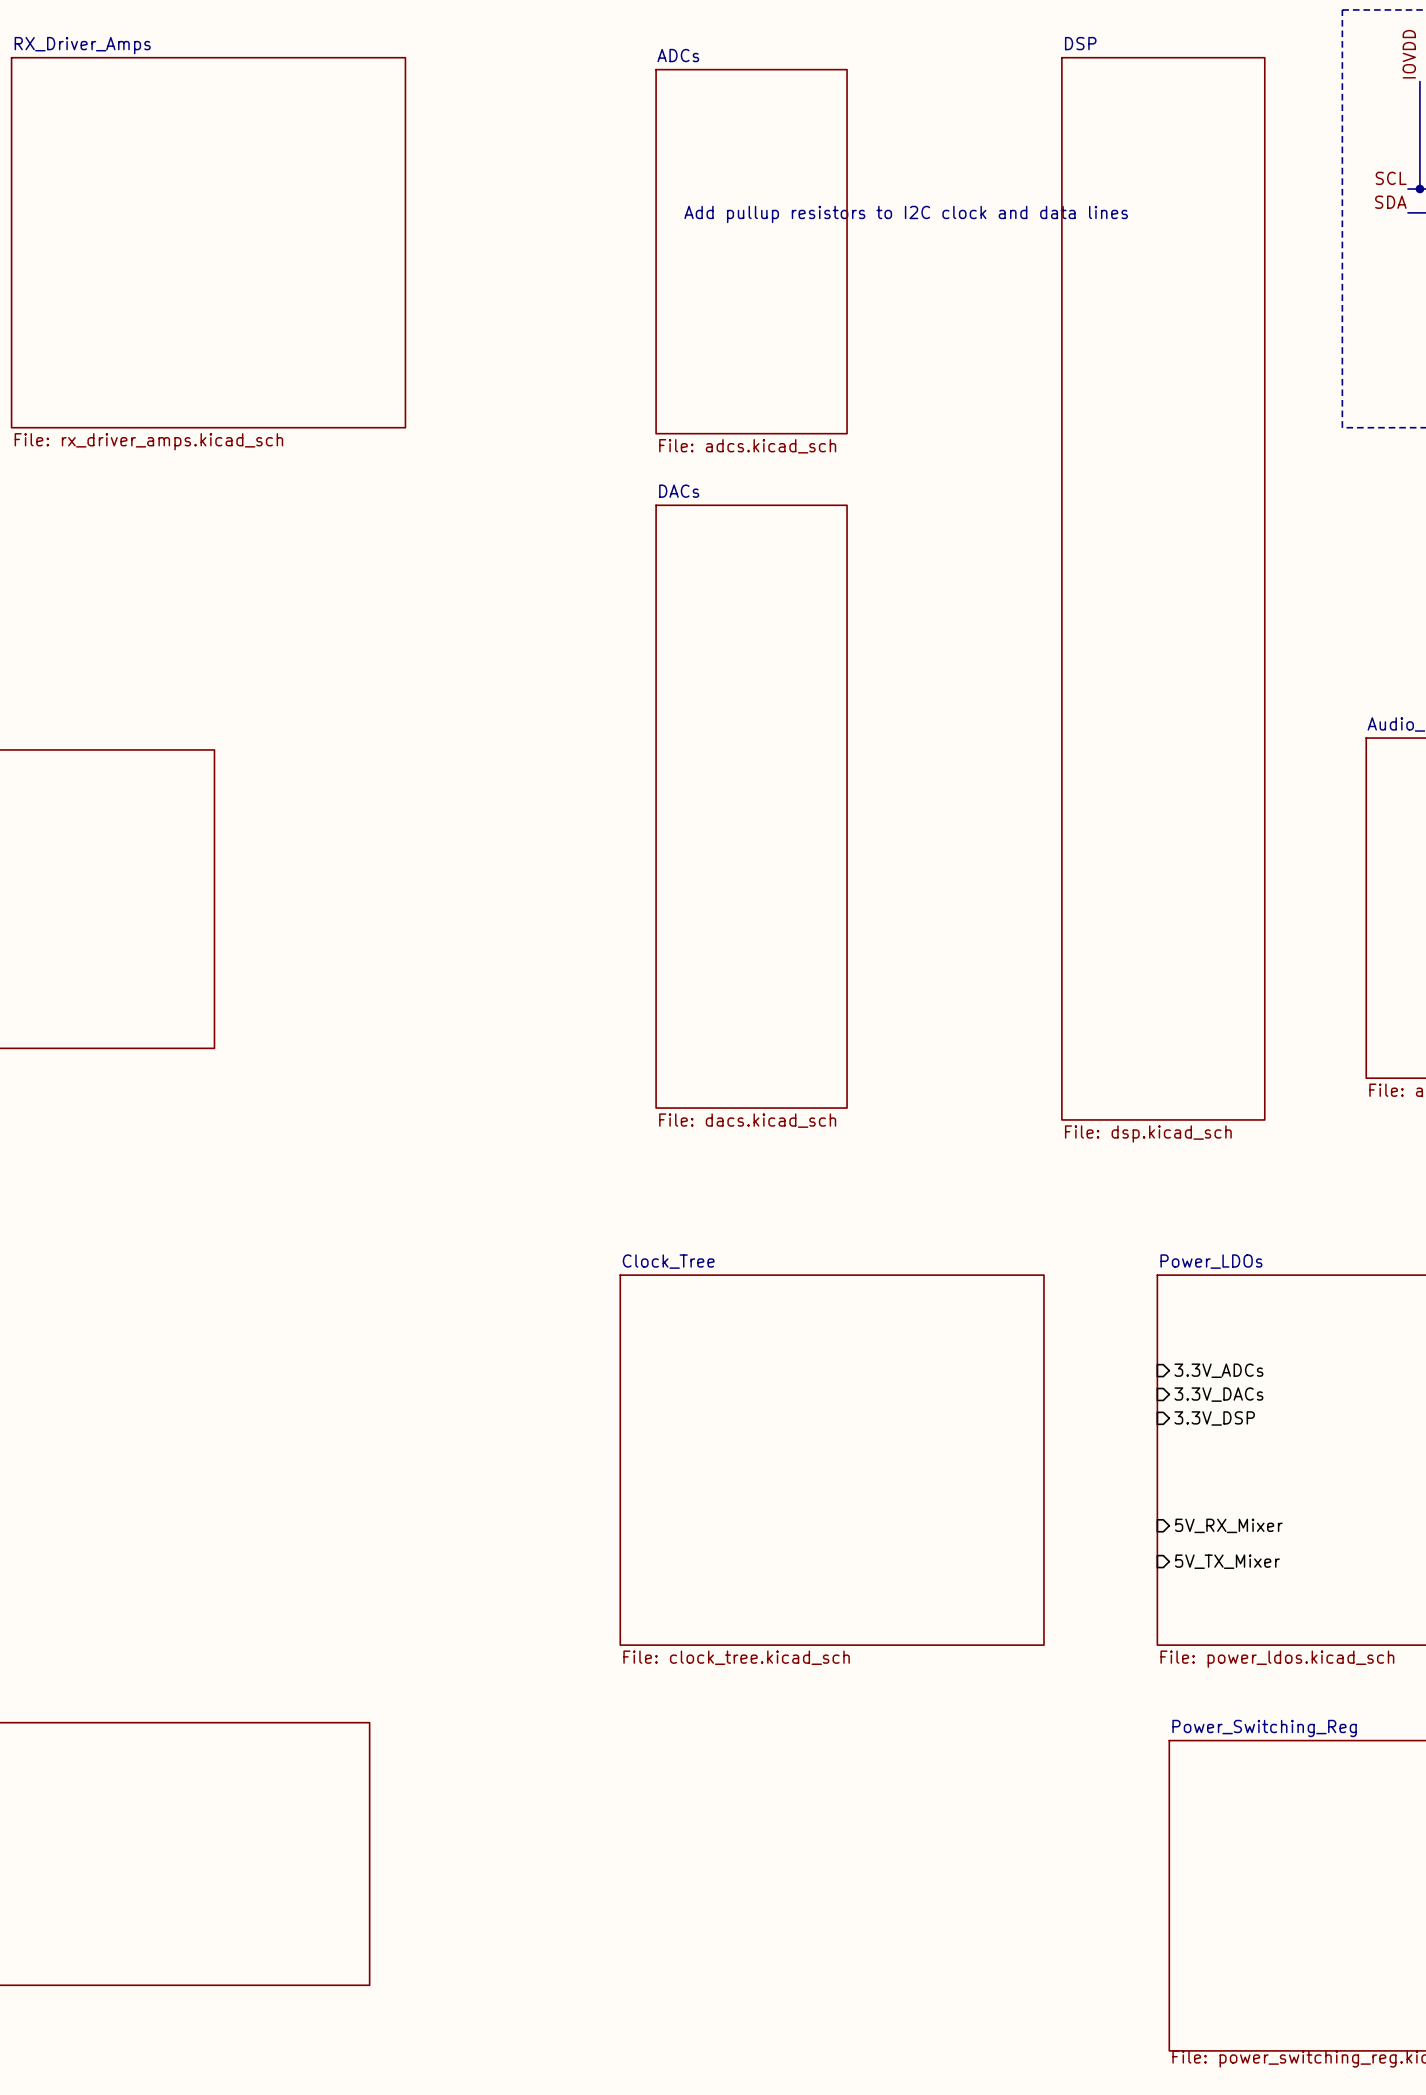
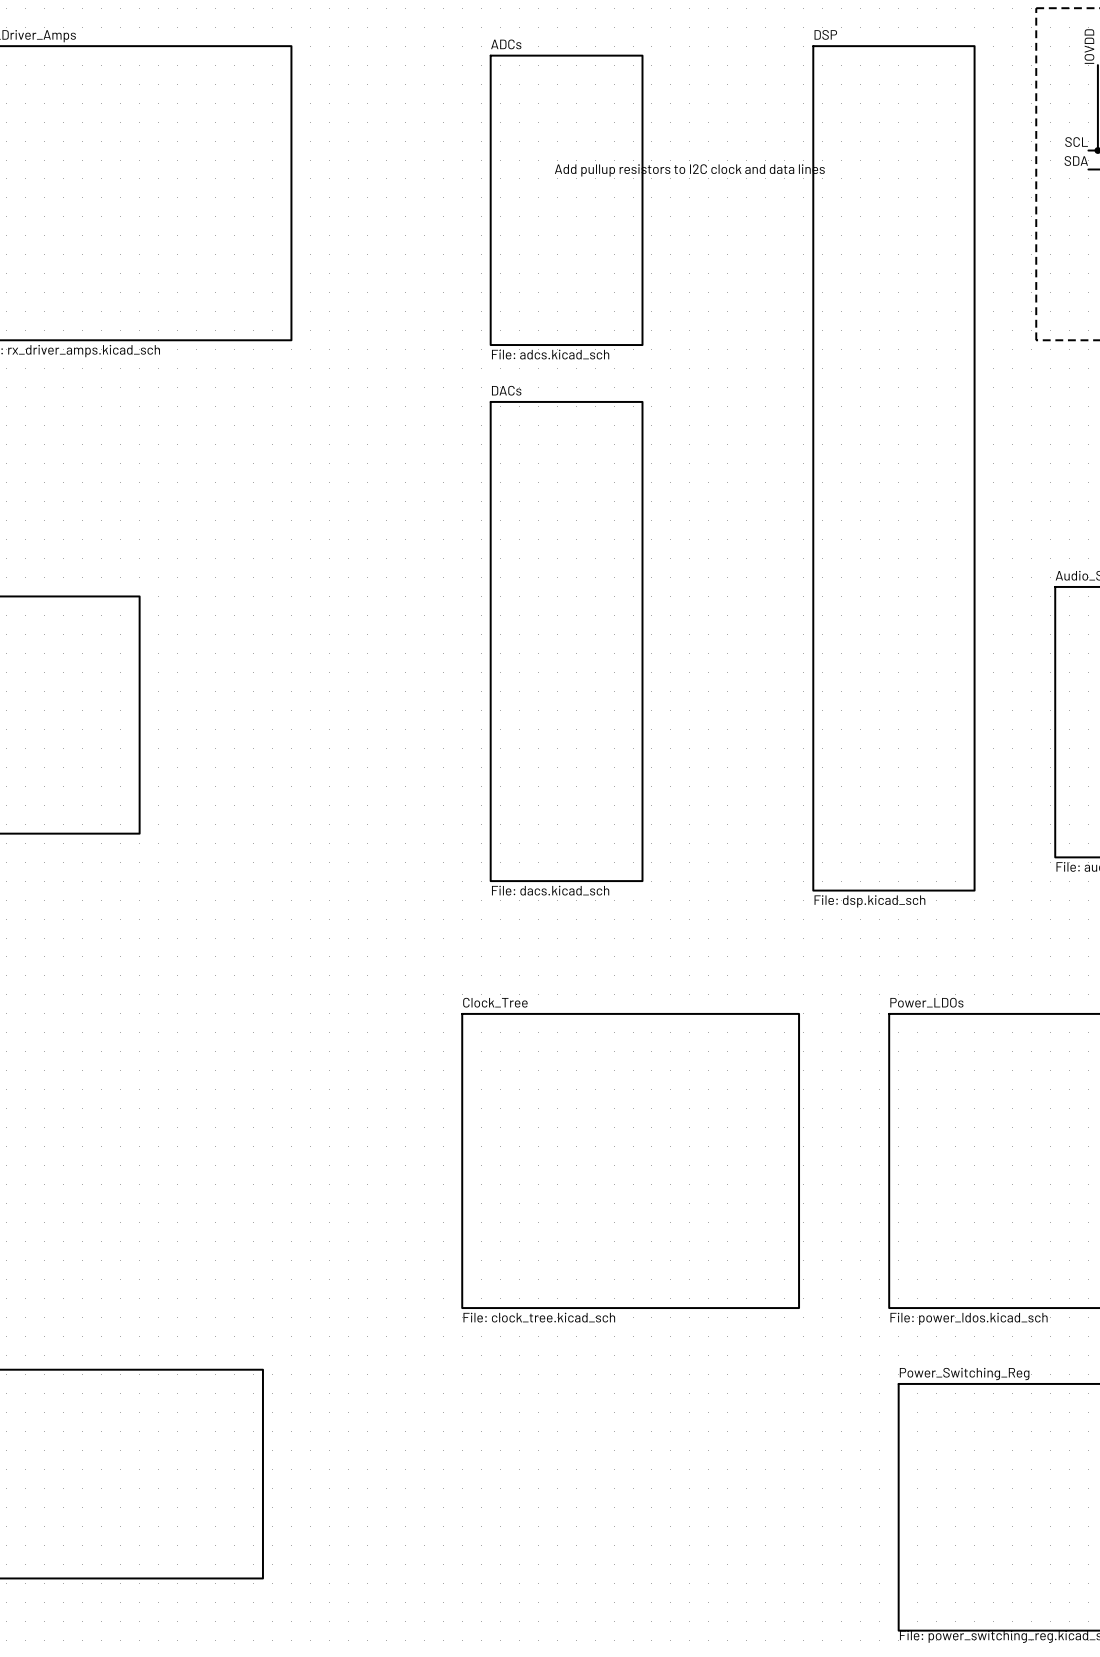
sheet pin: 3.3V_ADCs (1218, 1370) -> none
sheet pin: 3.3V_DACs (1218, 1394) -> none
sheet pin: 3.3V_DSP (1214, 1418) -> none
sheet pin: 5V_RX_Mixer (1228, 1525) -> none
sheet pin: 5V_TX_Mixer (1227, 1561) -> none

